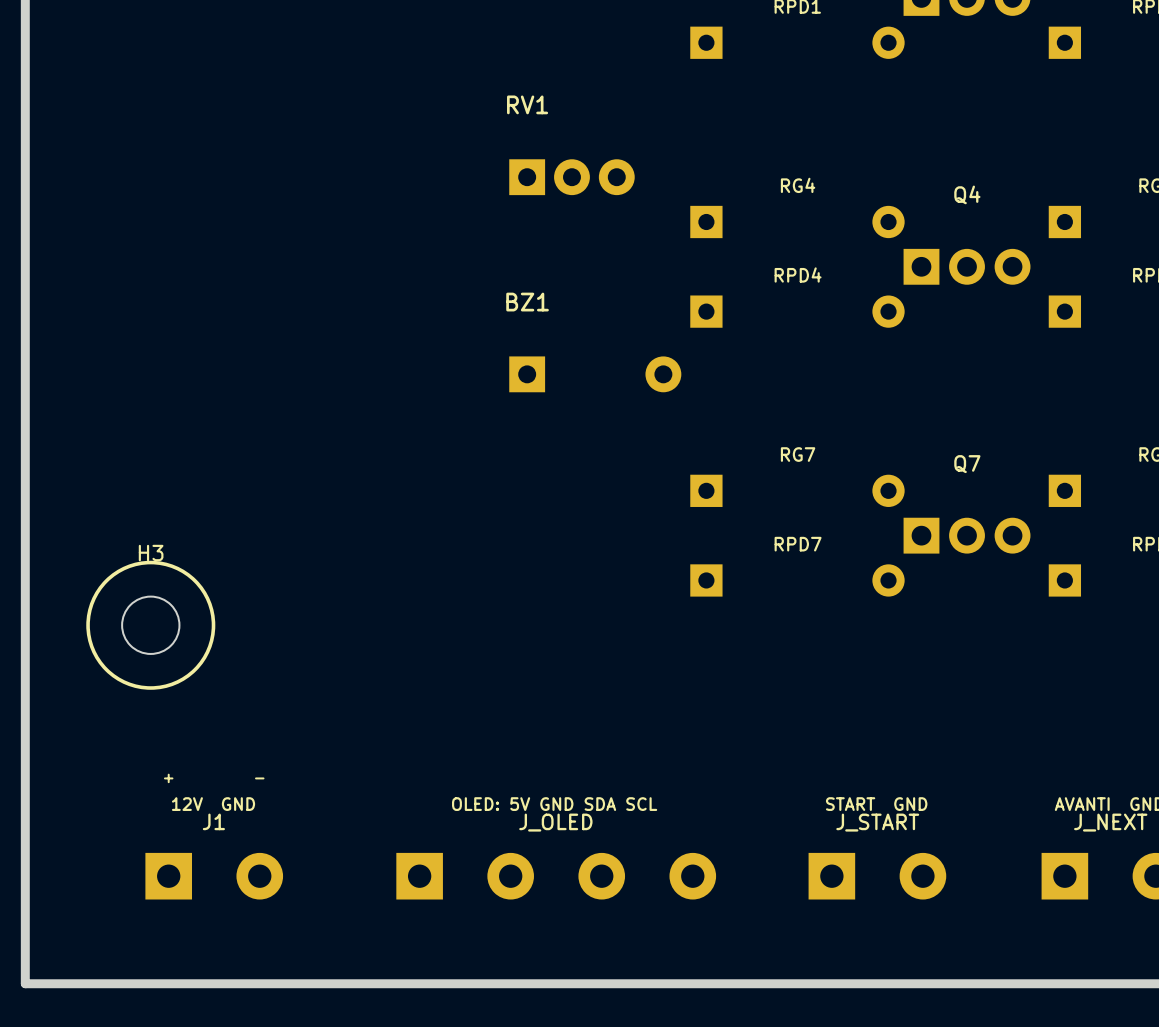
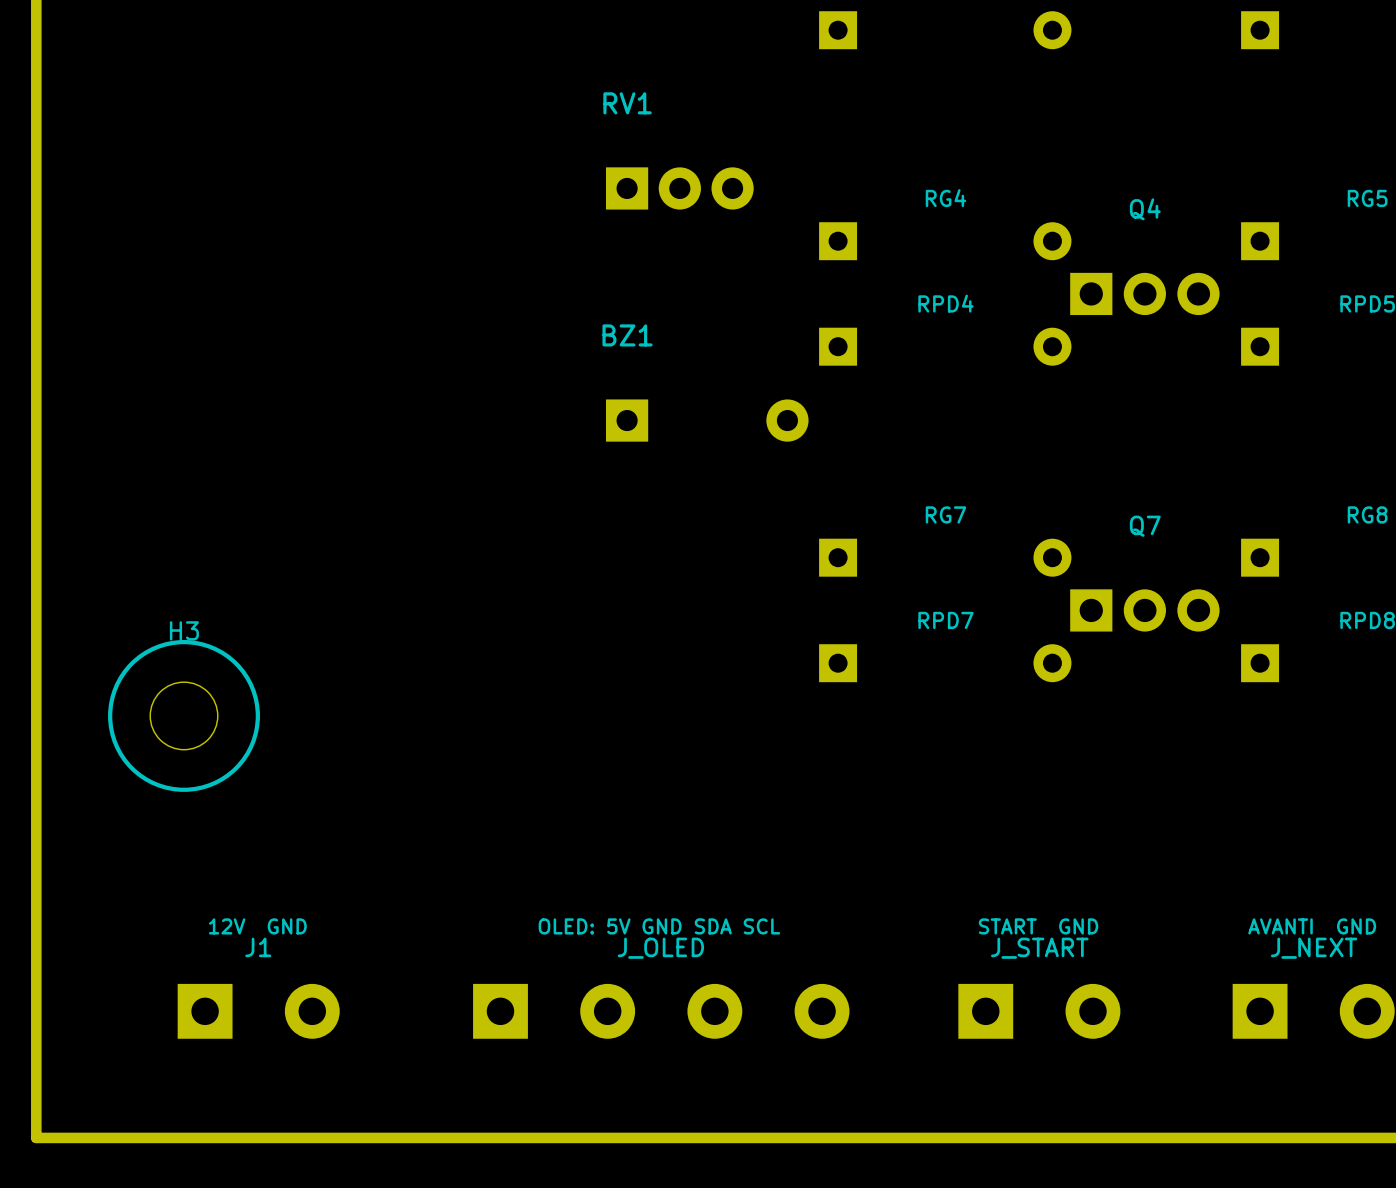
text: + (168, 778) -> none
text: - (259, 778) -> none

